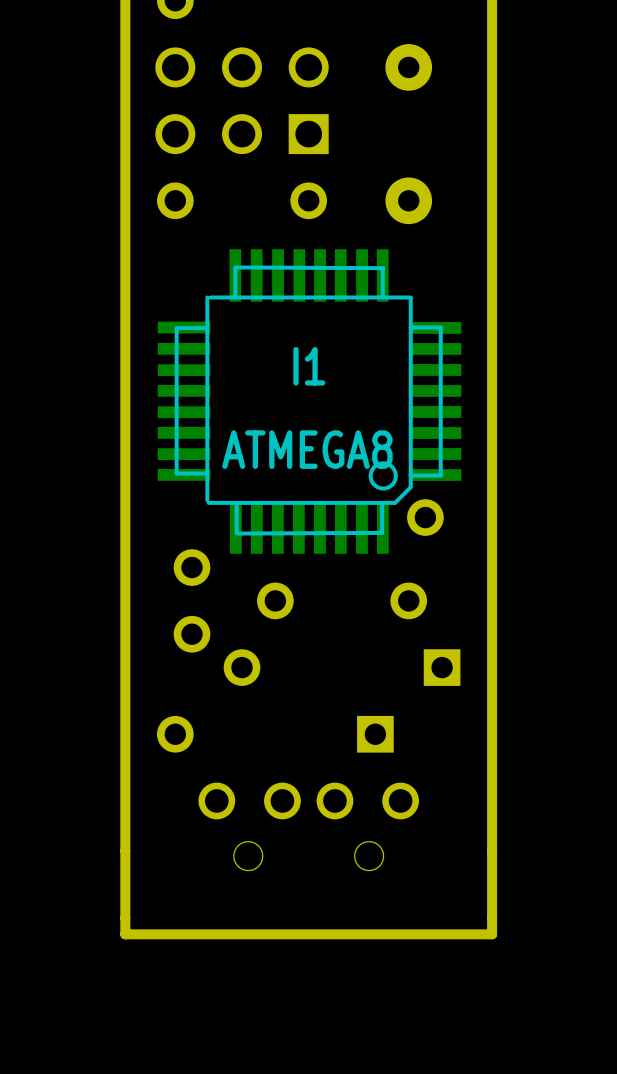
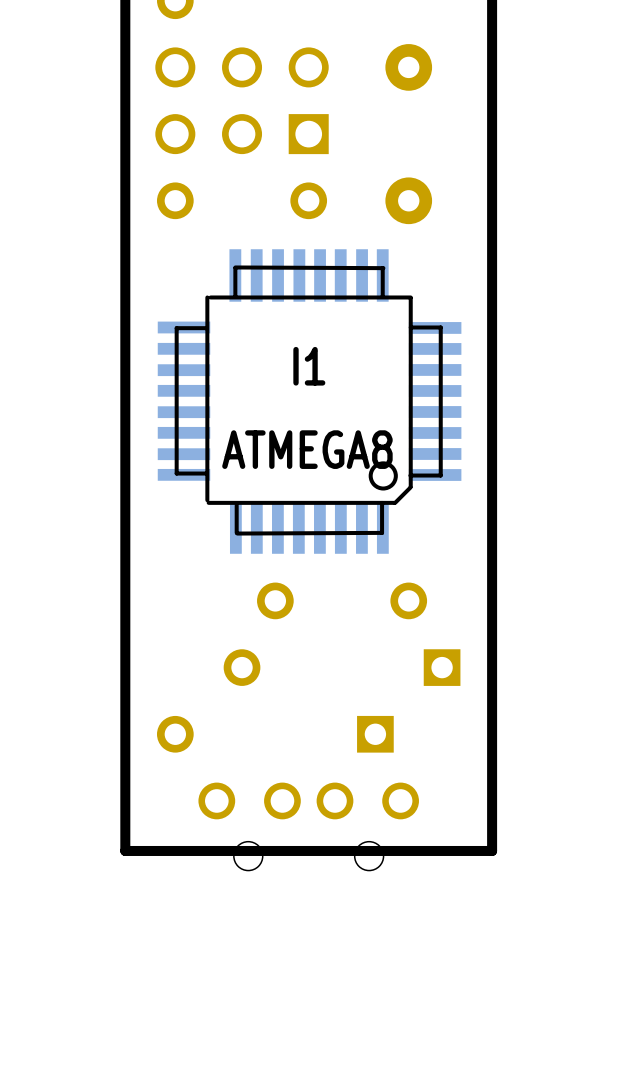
part: (425, 517) -> none
part: (192, 567) -> none
part: (192, 634) -> none
board edge: (492, 850) (492, 934) (125, 934) (125, 850) -> (492, 850) (125, 850)

